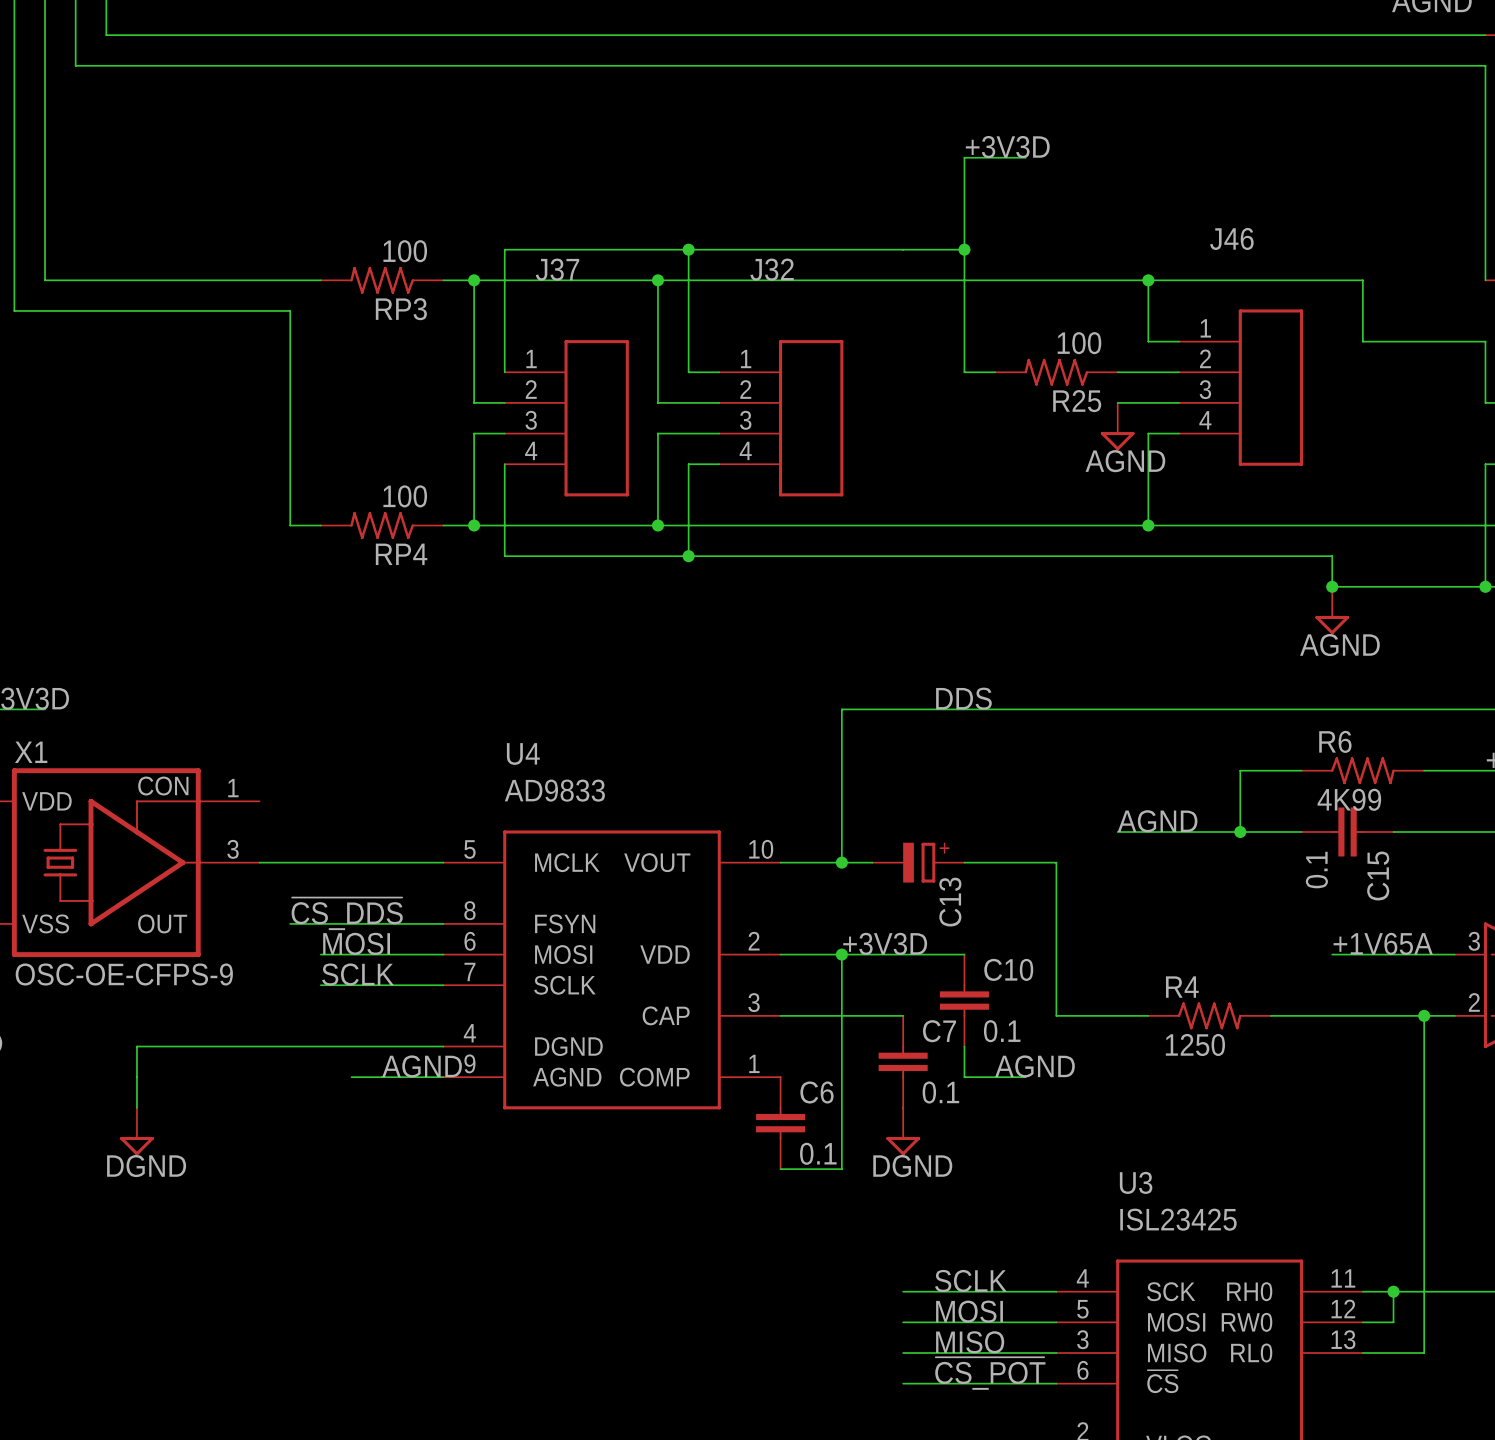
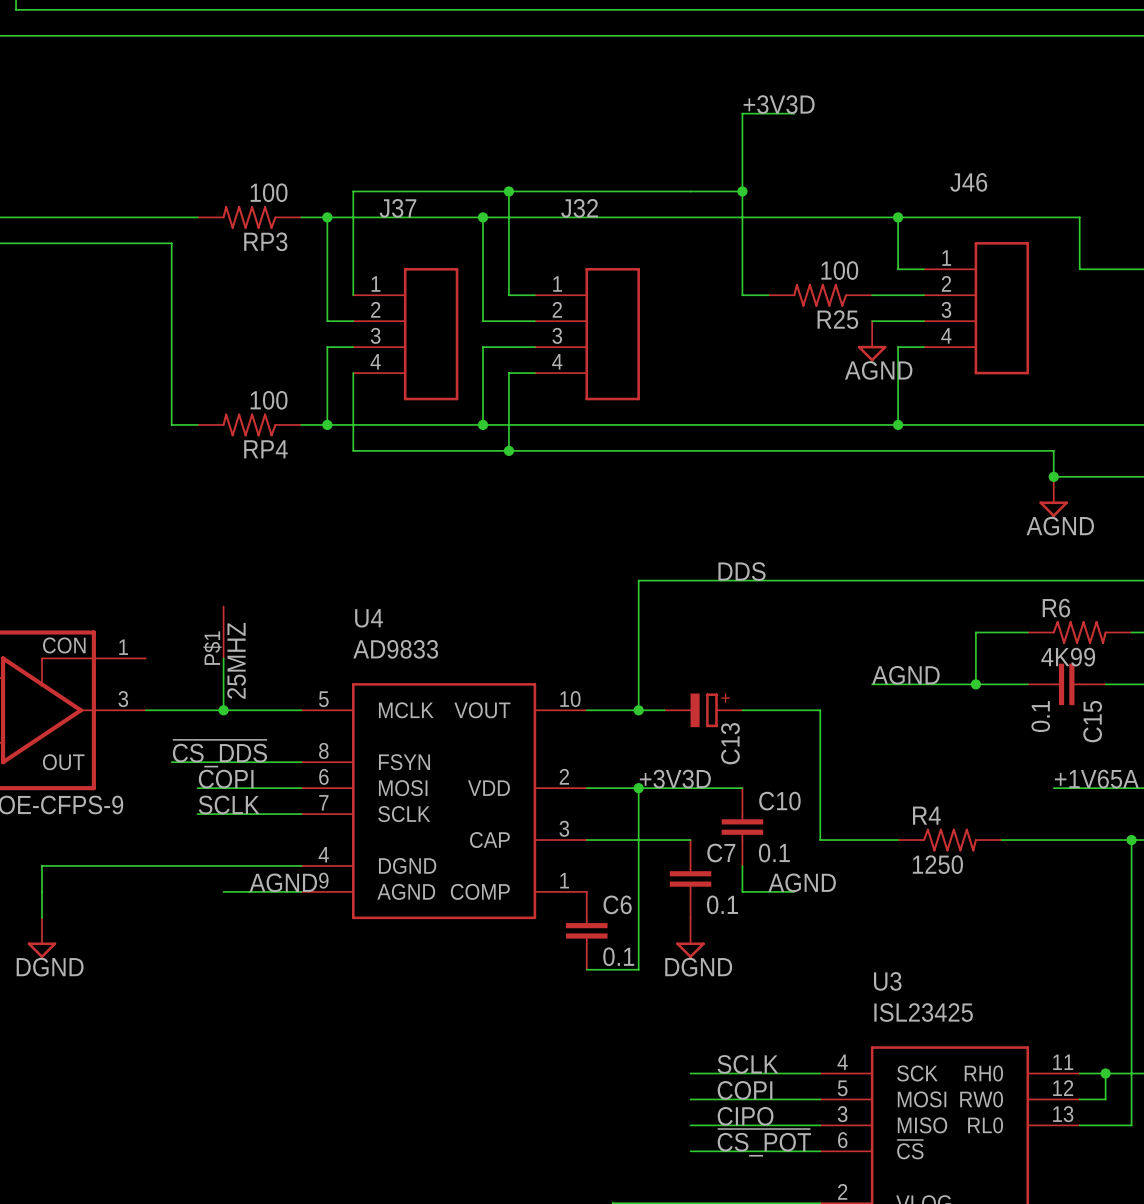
25MHZ: none -> (223, 632)
wire: none -> (223, 658) (223, 710)
junction: none -> (223, 710)
label: MOSI (356, 943) -> COPI (226, 779)
label: MOSI (969, 1311) -> COPI (745, 1090)
label: MISO (970, 1342) -> CIPO (745, 1116)

